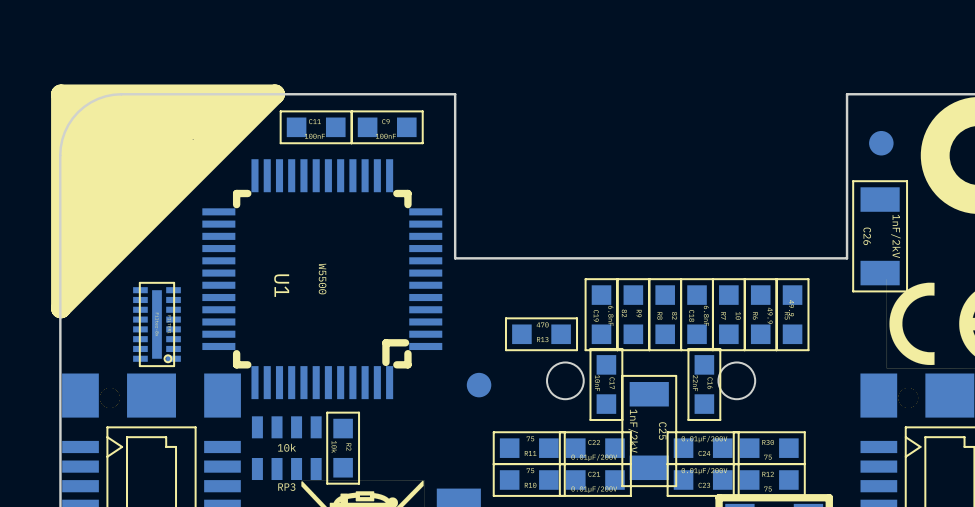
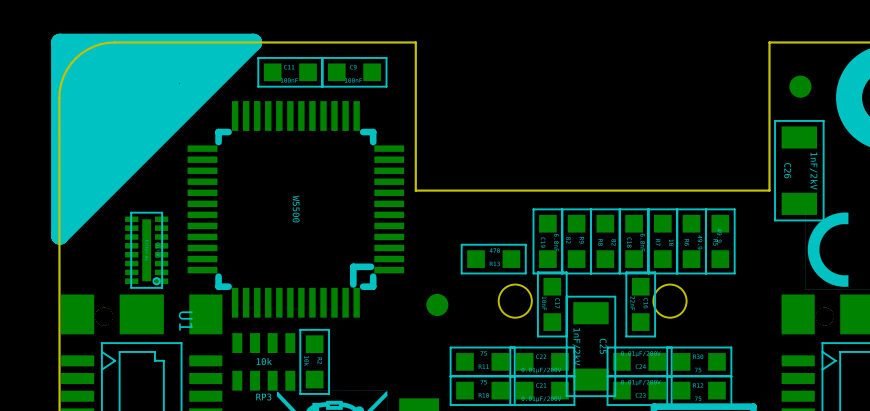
U1 name position: U1 (281, 285) -> U1 (185, 321)

